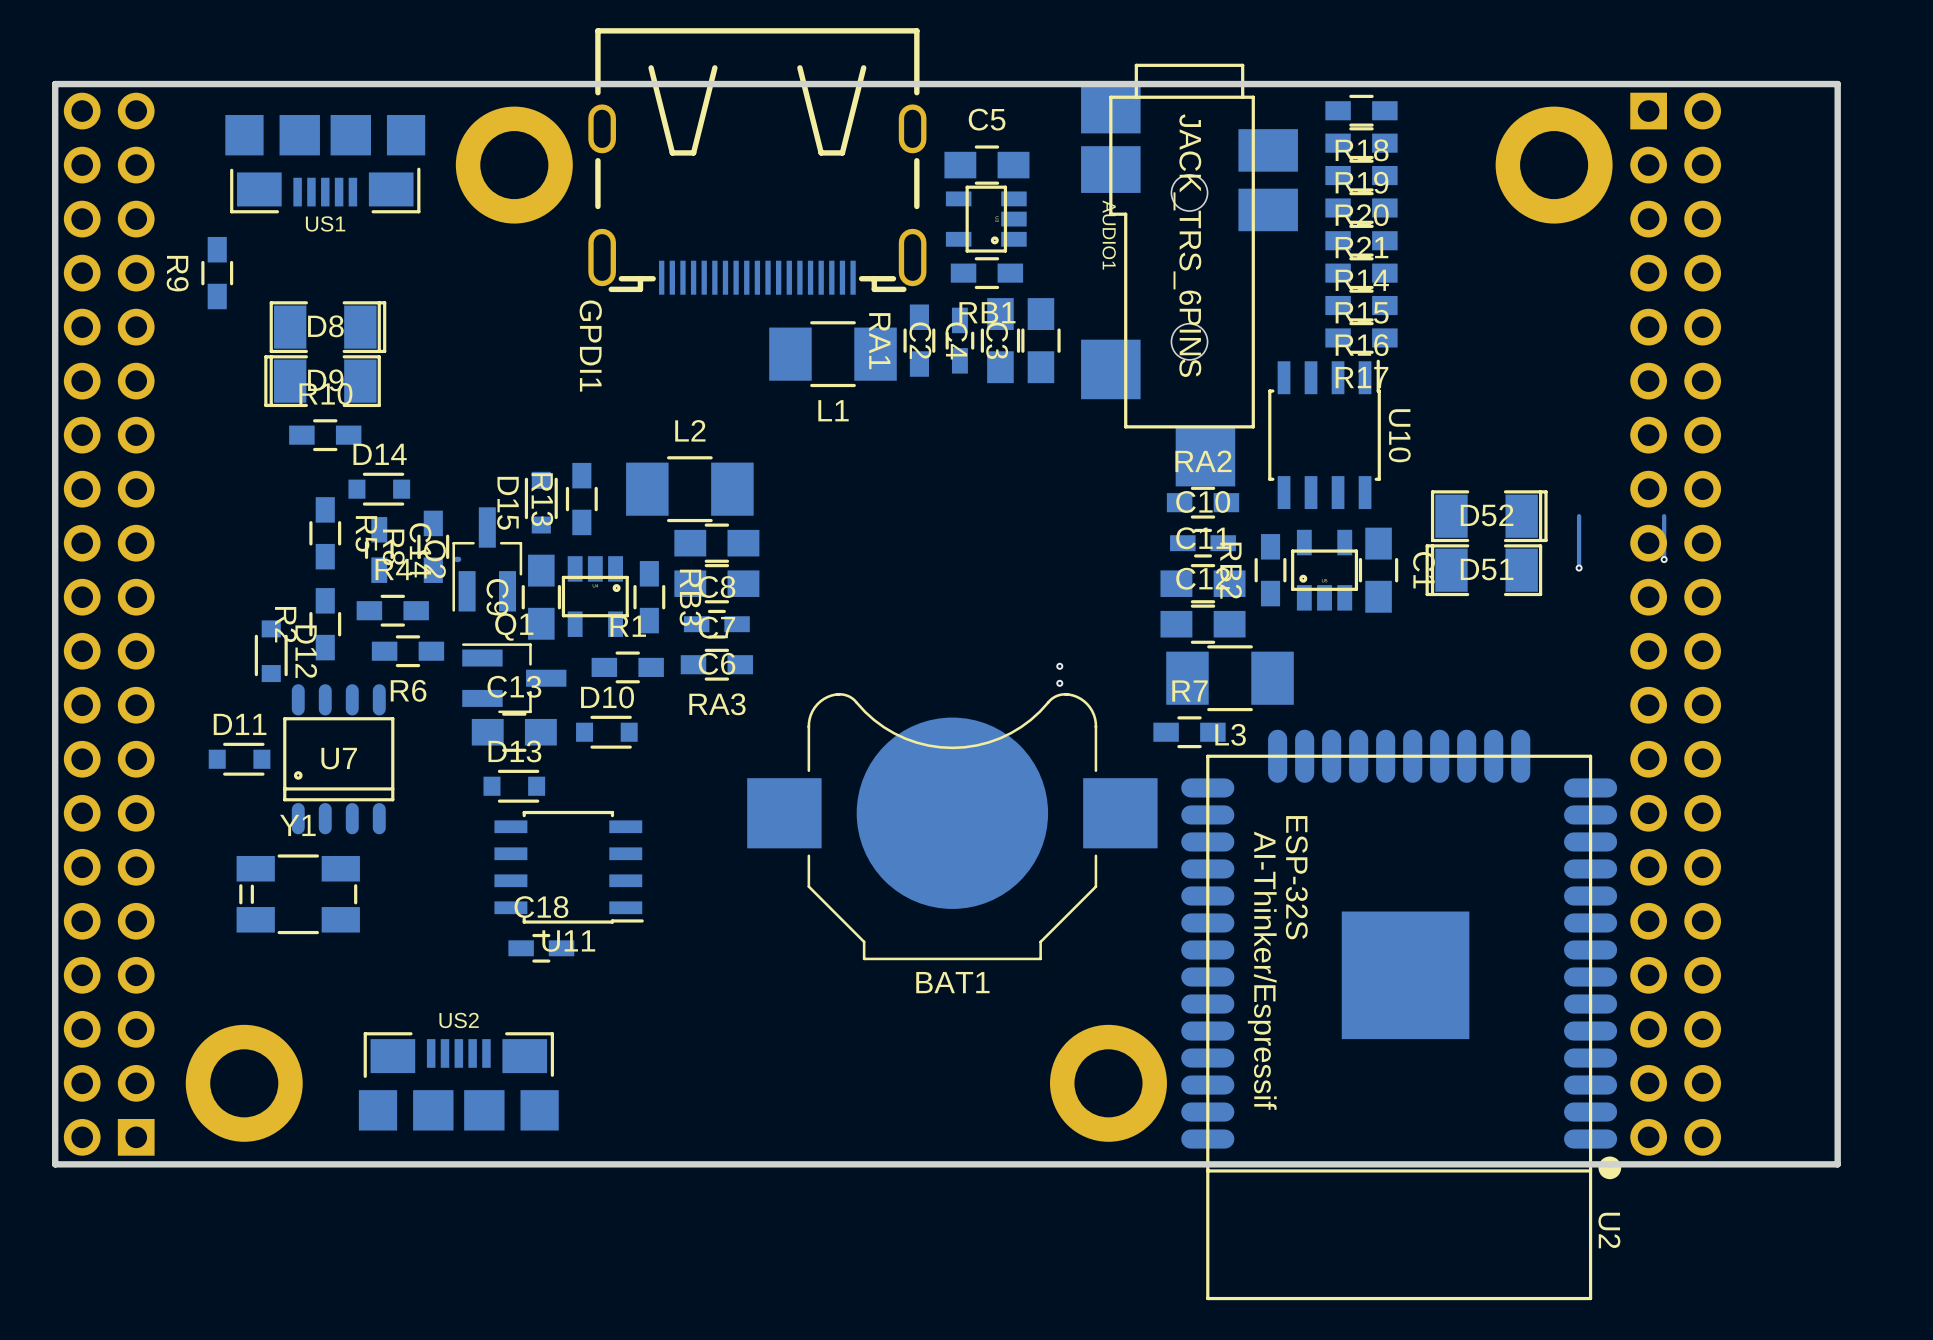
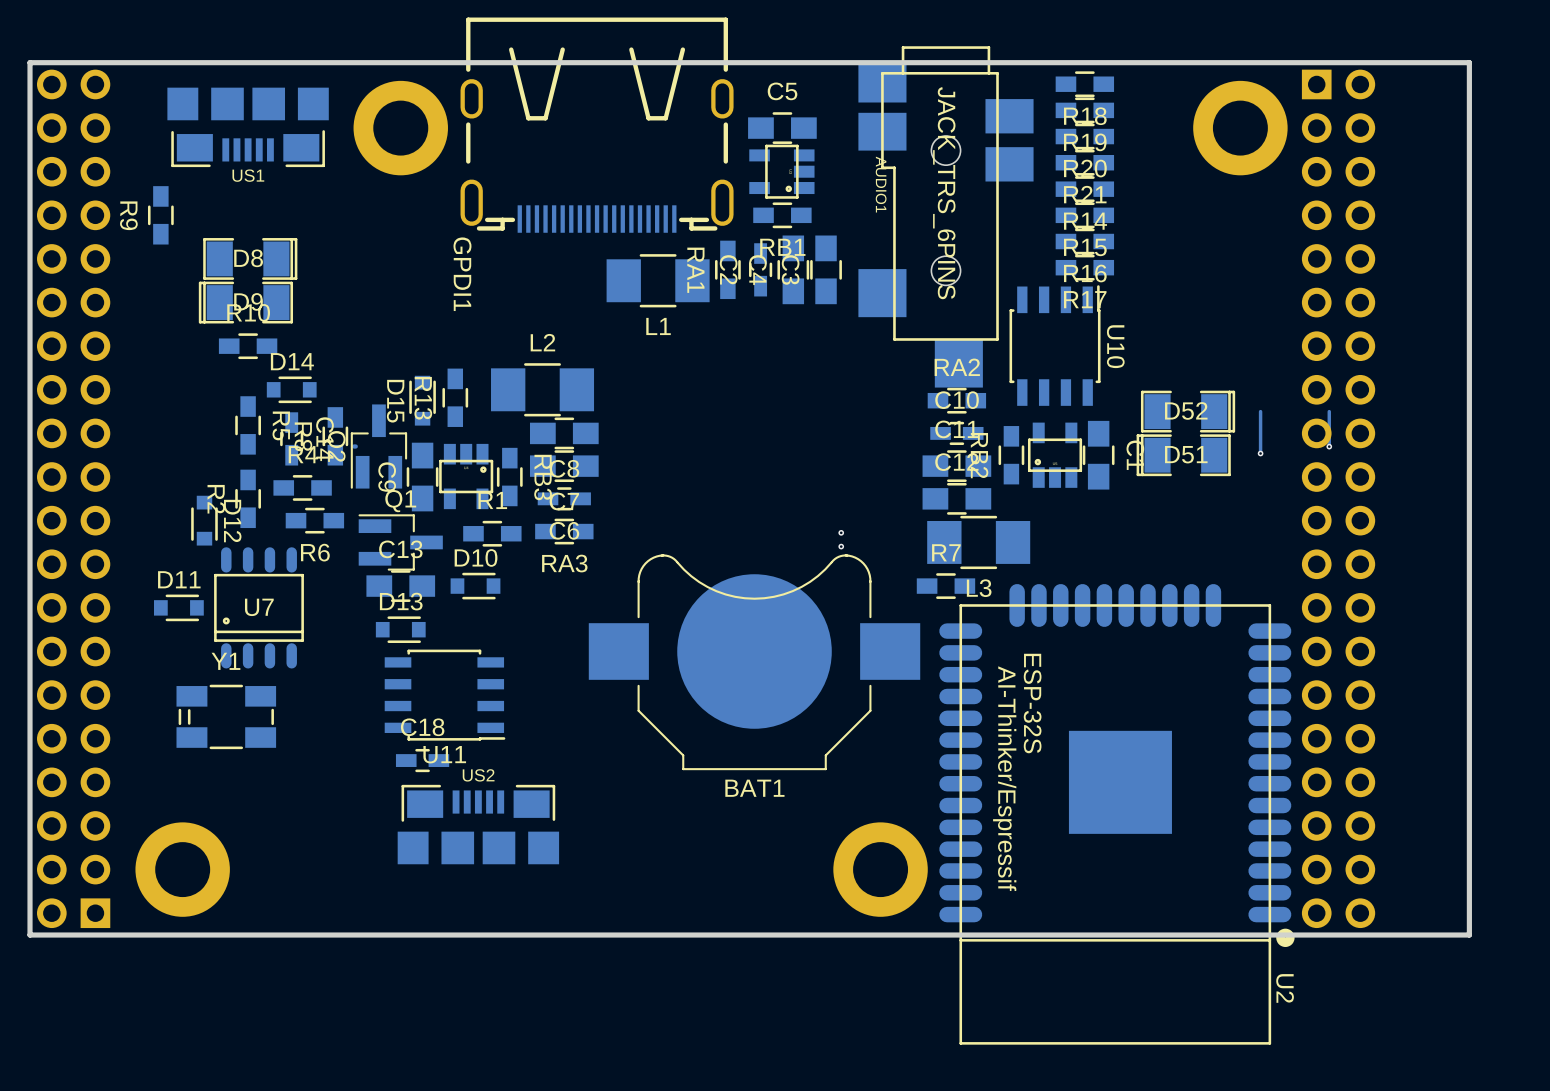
US2 position: (458, 1081) -> (478, 824)

